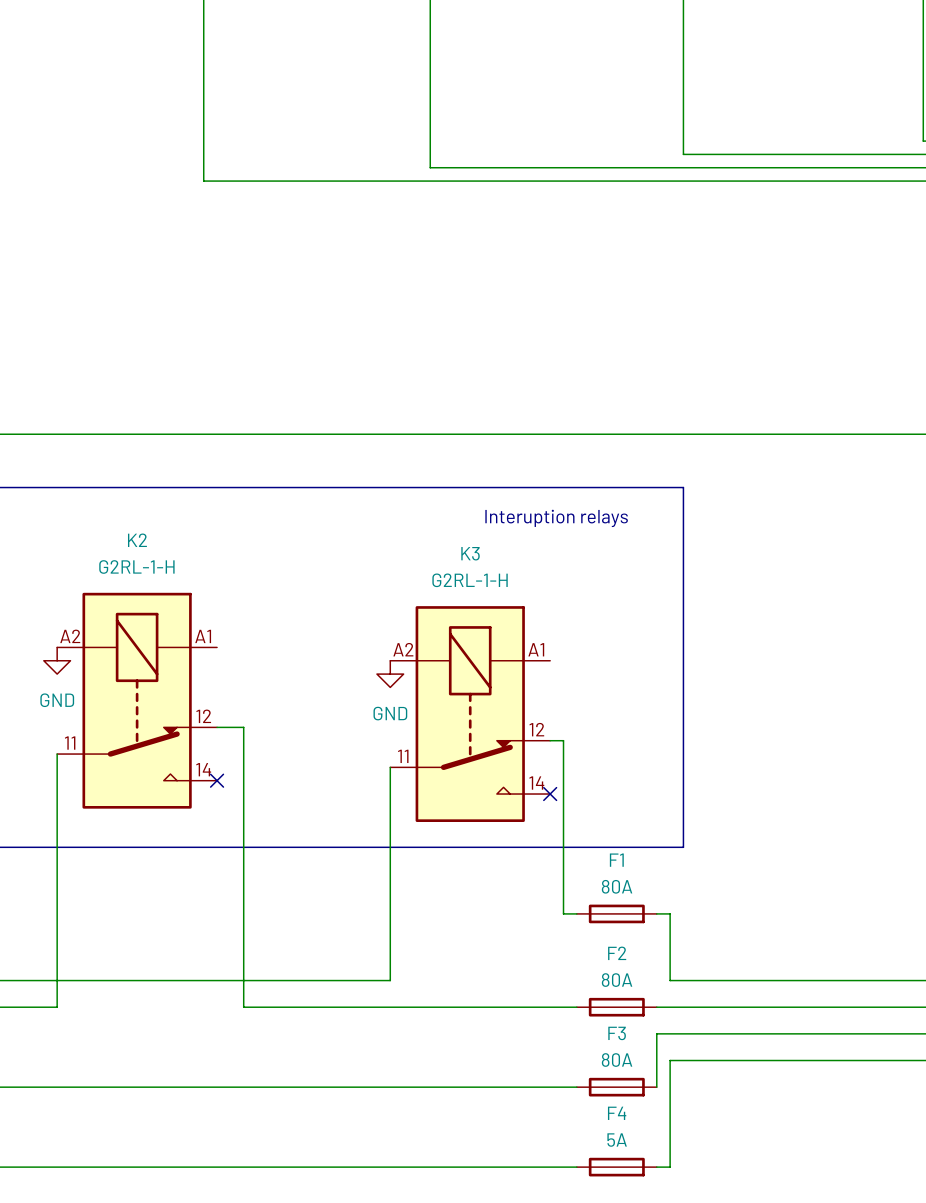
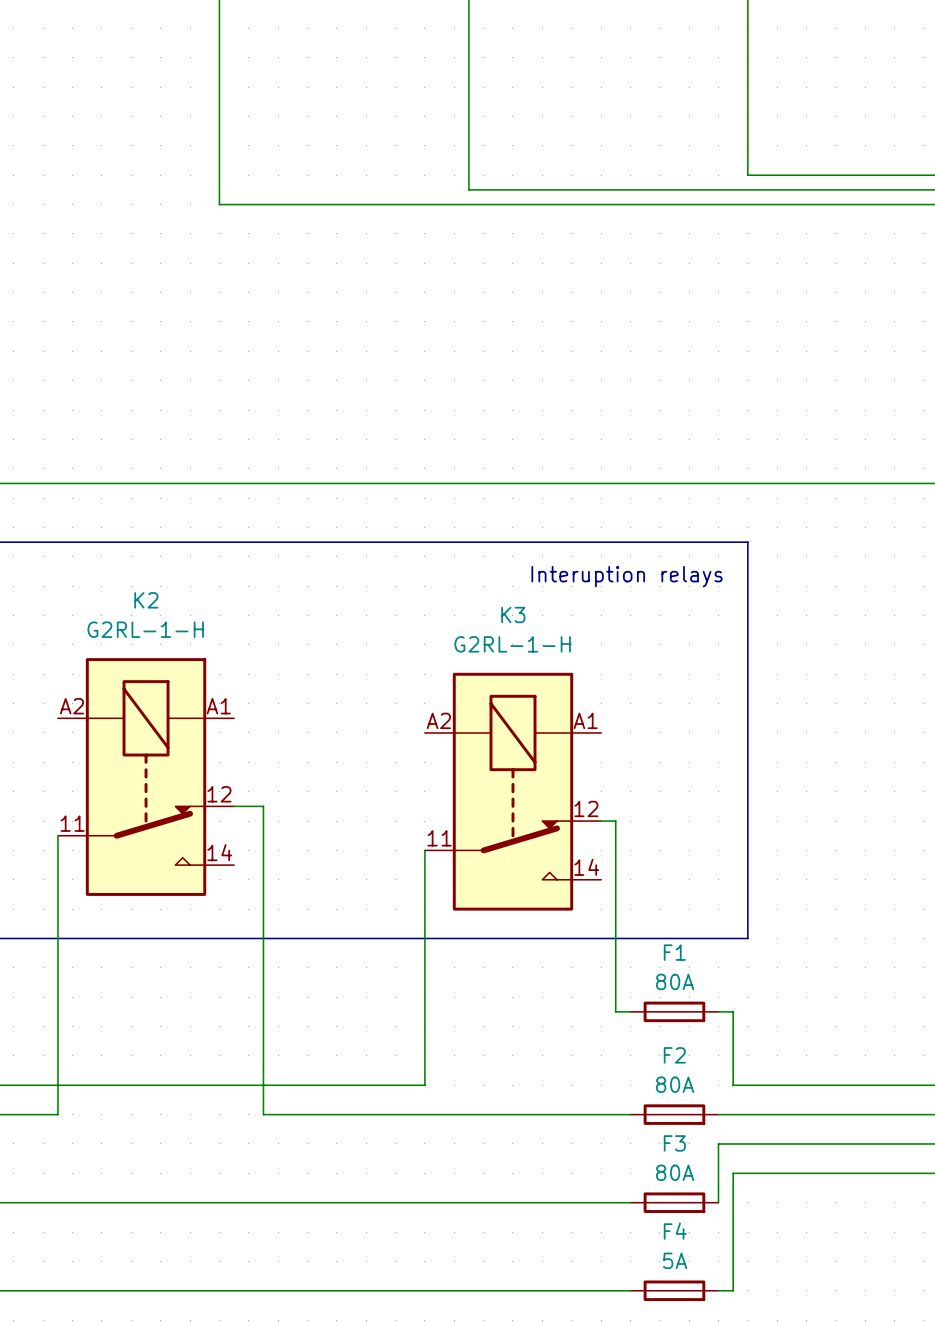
power symbol: GND (57, 660) -> none
power symbol: GND (390, 674) -> none
no-connect mark: (217, 780) -> none
no-connect mark: (550, 794) -> none

